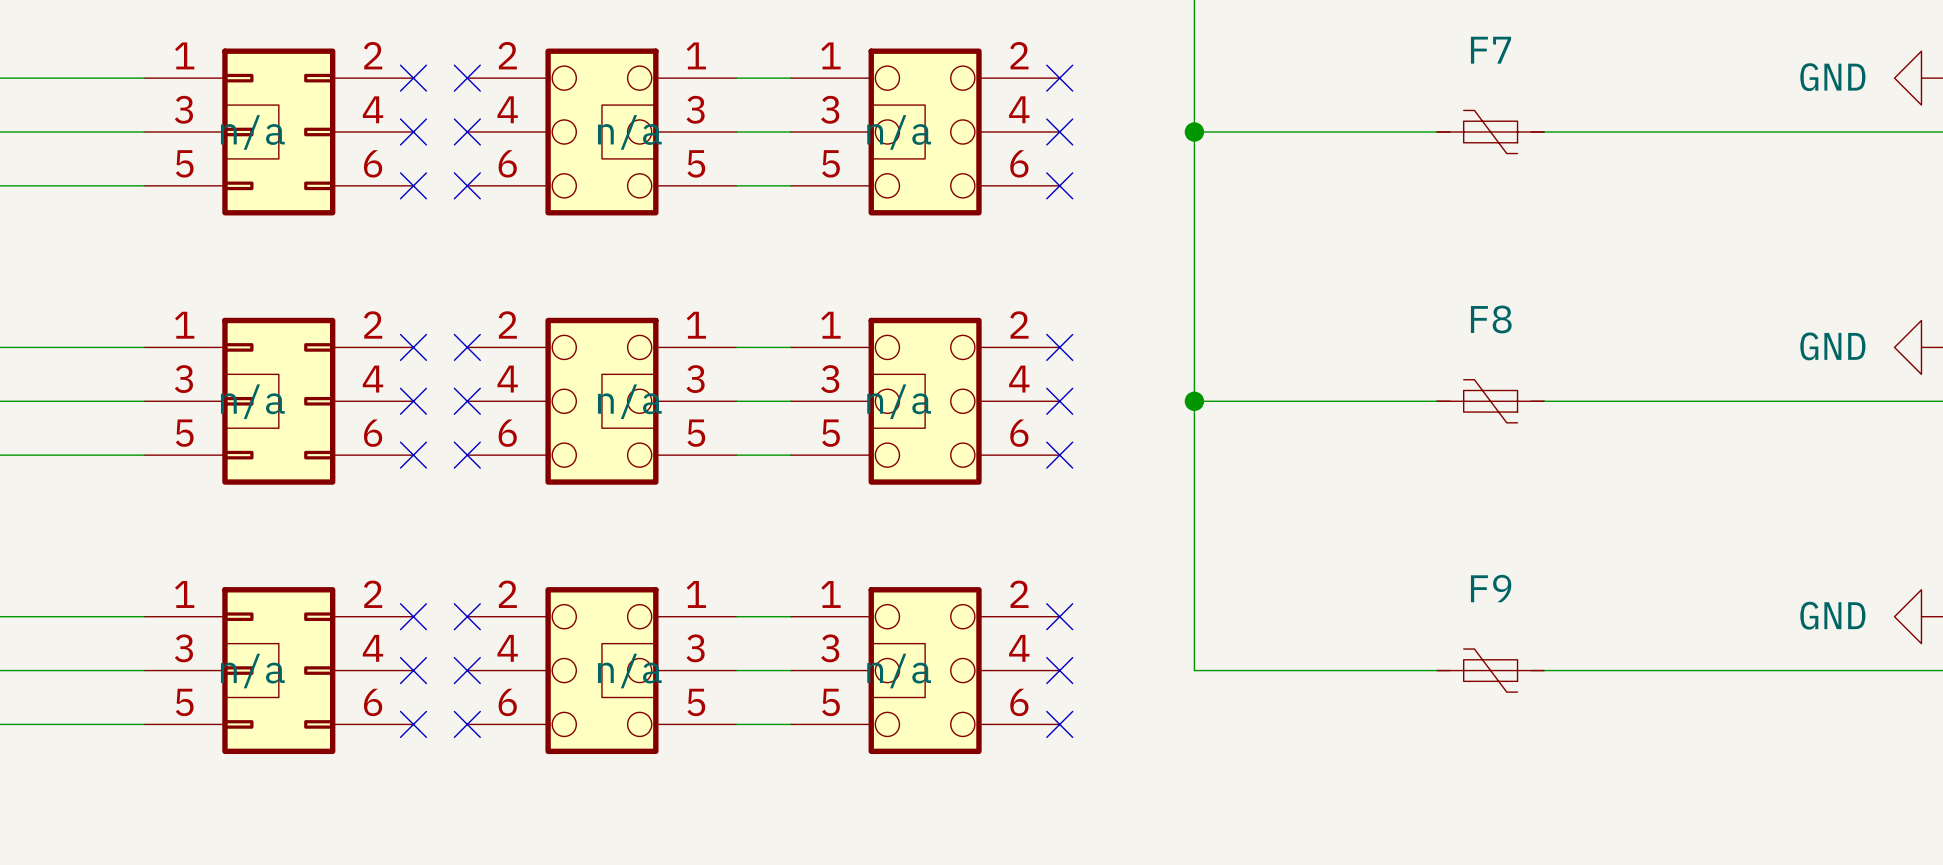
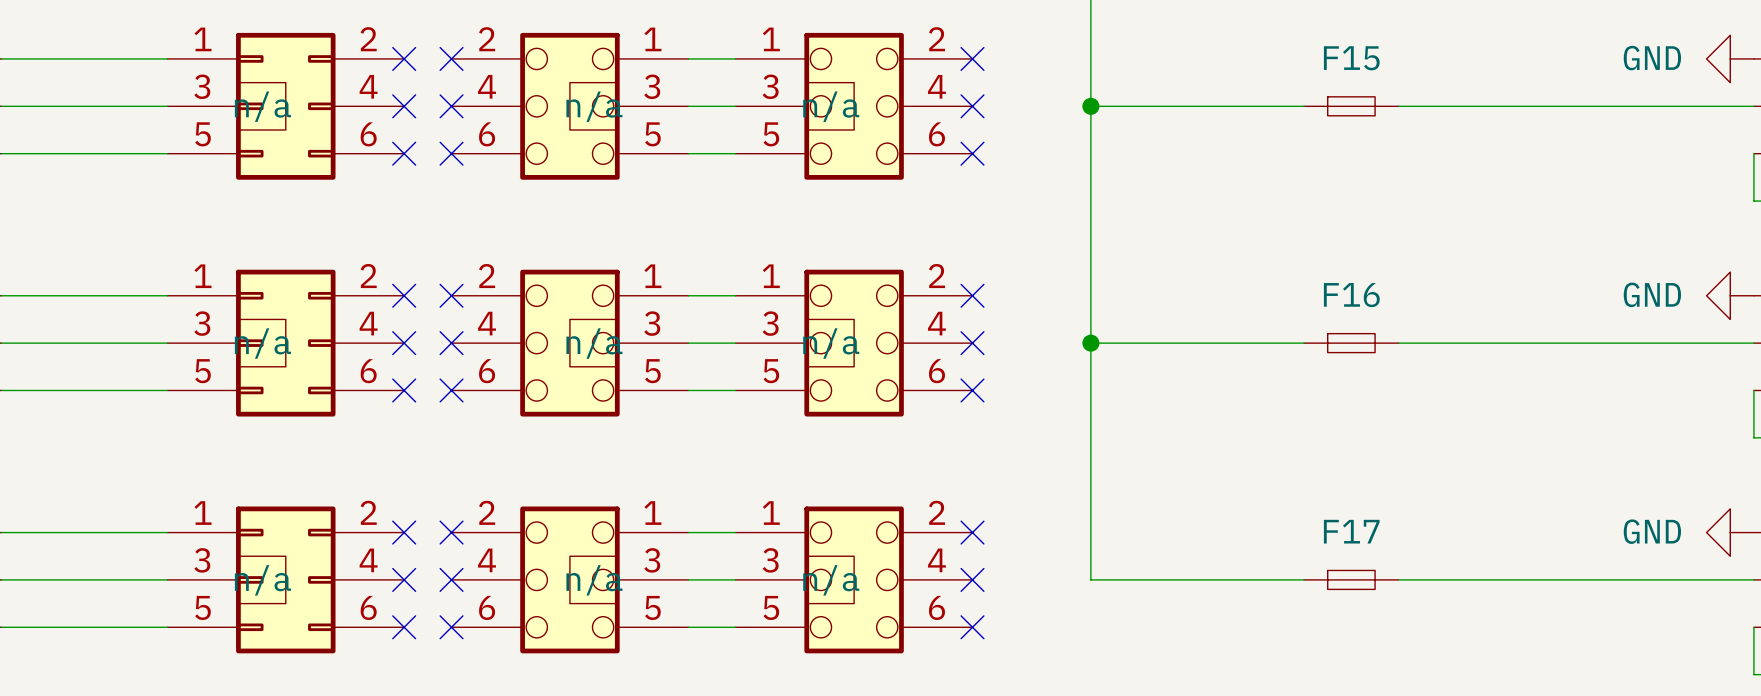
F7: (1490, 131) -> none
F15: none -> (1351, 106)
F8: (1490, 401) -> none
F16: none -> (1351, 343)
F9: (1490, 670) -> none
F17: none -> (1351, 579)

